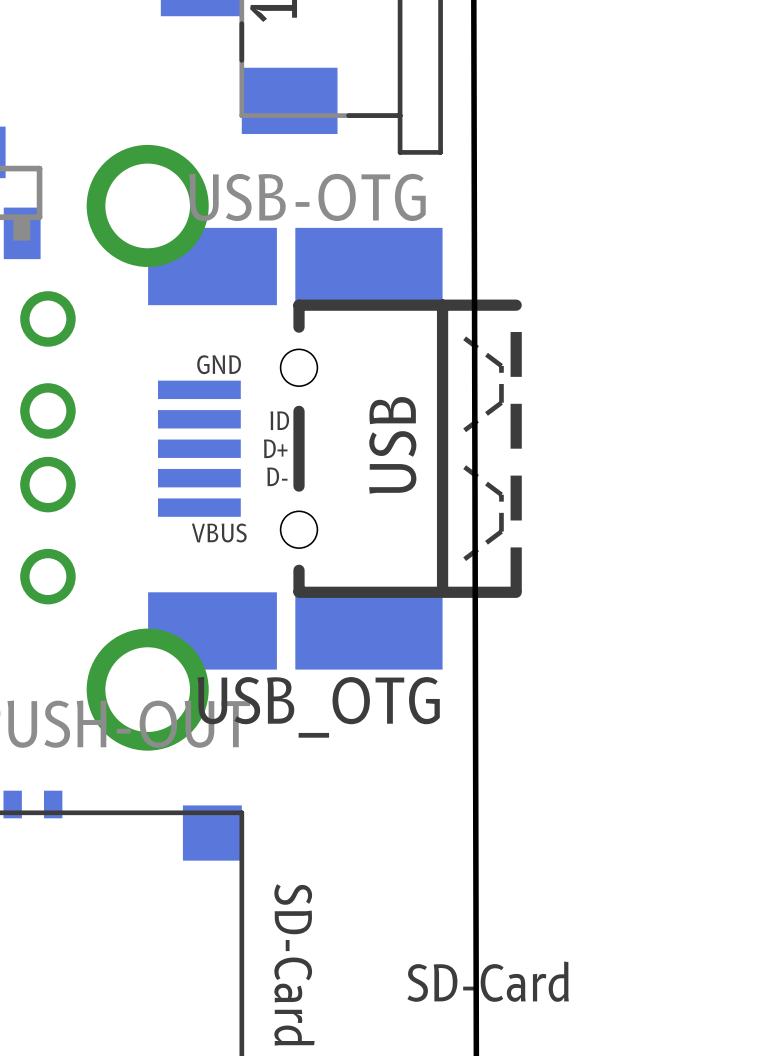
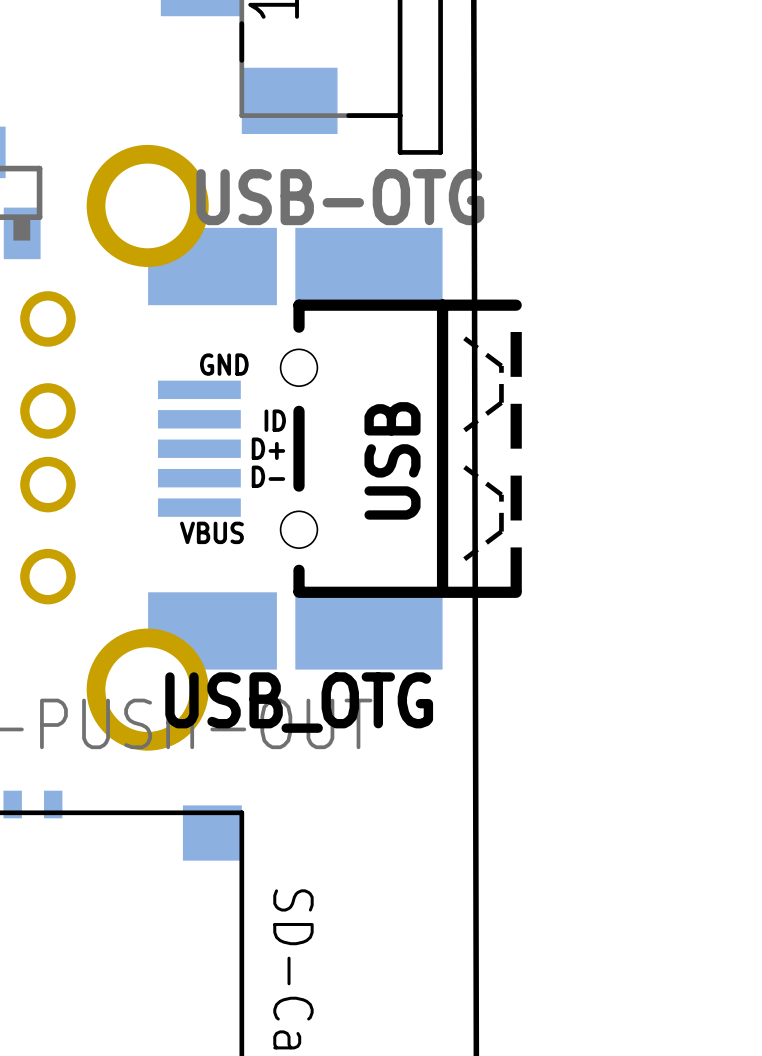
text: SD-Card (488, 981) -> none

